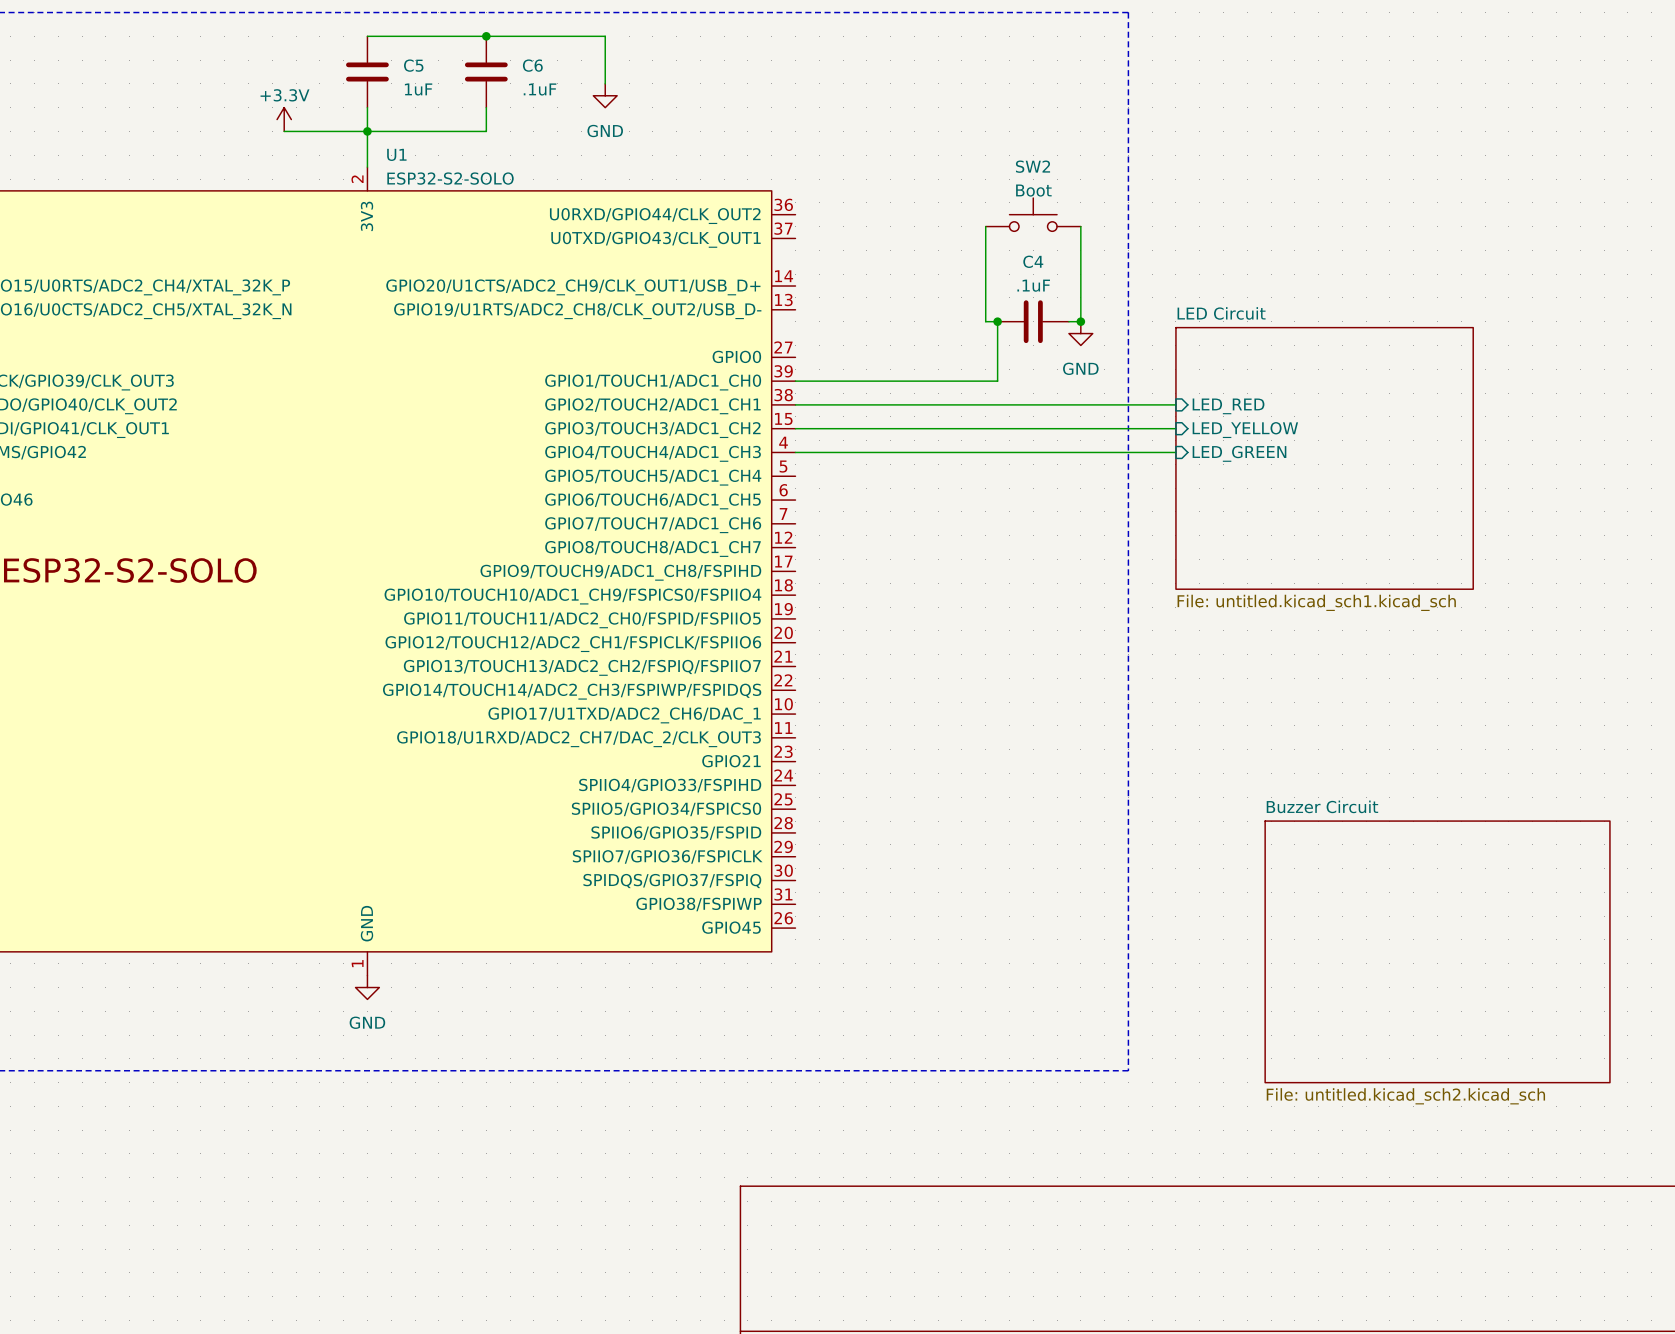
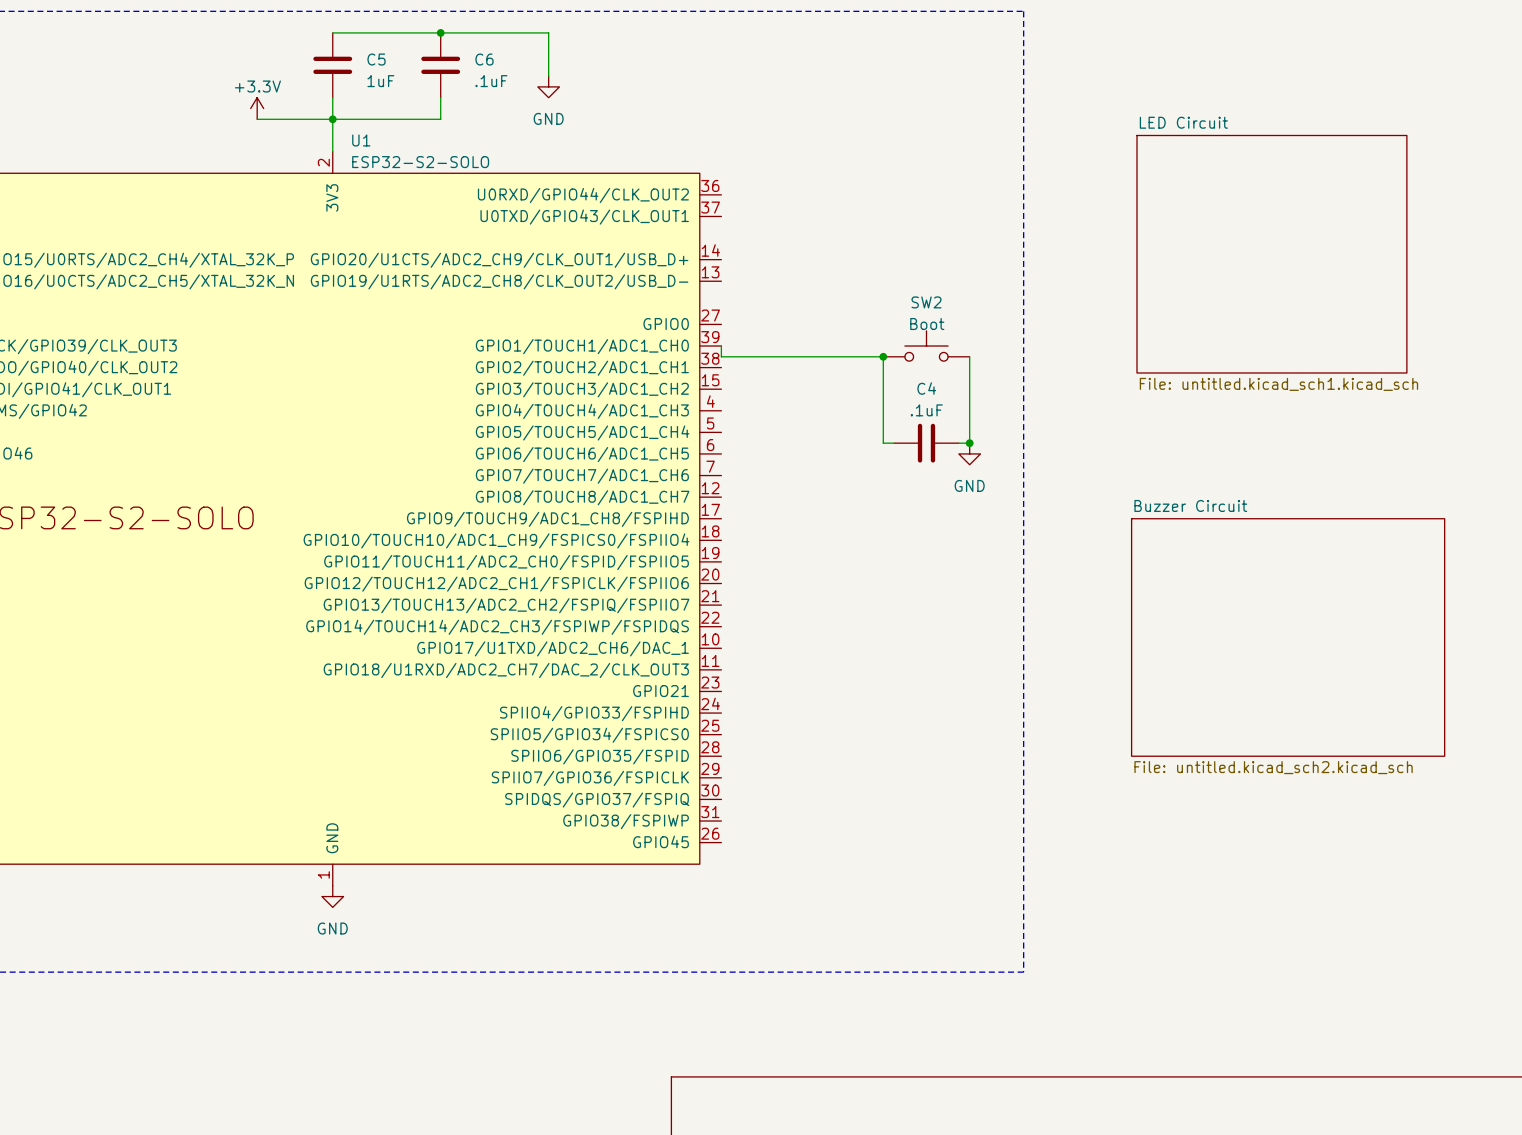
SW2 position: (1033, 214) -> (926, 346)
wire: (985, 226) (985, 321) (997, 321) (997, 381) (795, 381) -> (894, 443) (883, 443) (883, 356) (721, 356) (721, 346)
wire: (1080, 226) (1080, 321) (1068, 321) -> (969, 356) (969, 443) (958, 443)
junction: (997, 321) -> none
C4 position: (1033, 321) -> (926, 443)
junction: (1080, 321) -> none
power symbol position: GND (1080, 333) -> GND (969, 453)
junction: none -> (883, 356)
wire: (795, 404) (1175, 404) -> none
sheet pin: LED_RED (1228, 406) -> none
wire: (795, 428) (1175, 428) -> none
sheet pin: LED_YELLOW (1245, 430) -> none
wire: (795, 452) (1175, 452) -> none
sheet pin: LED_GREEN (1239, 453) -> none
sheet LED Circuit position: (1324, 458) -> (1271, 254)
junction: none -> (969, 443)
sheet Buzzer Circuit: none -> File: untitled.kicad_sch2.kicad_sch (1288, 637)
sheet Buzzer Circuit: File: untitled.kicad_sch2.kicad_sch (1437, 951) -> none

